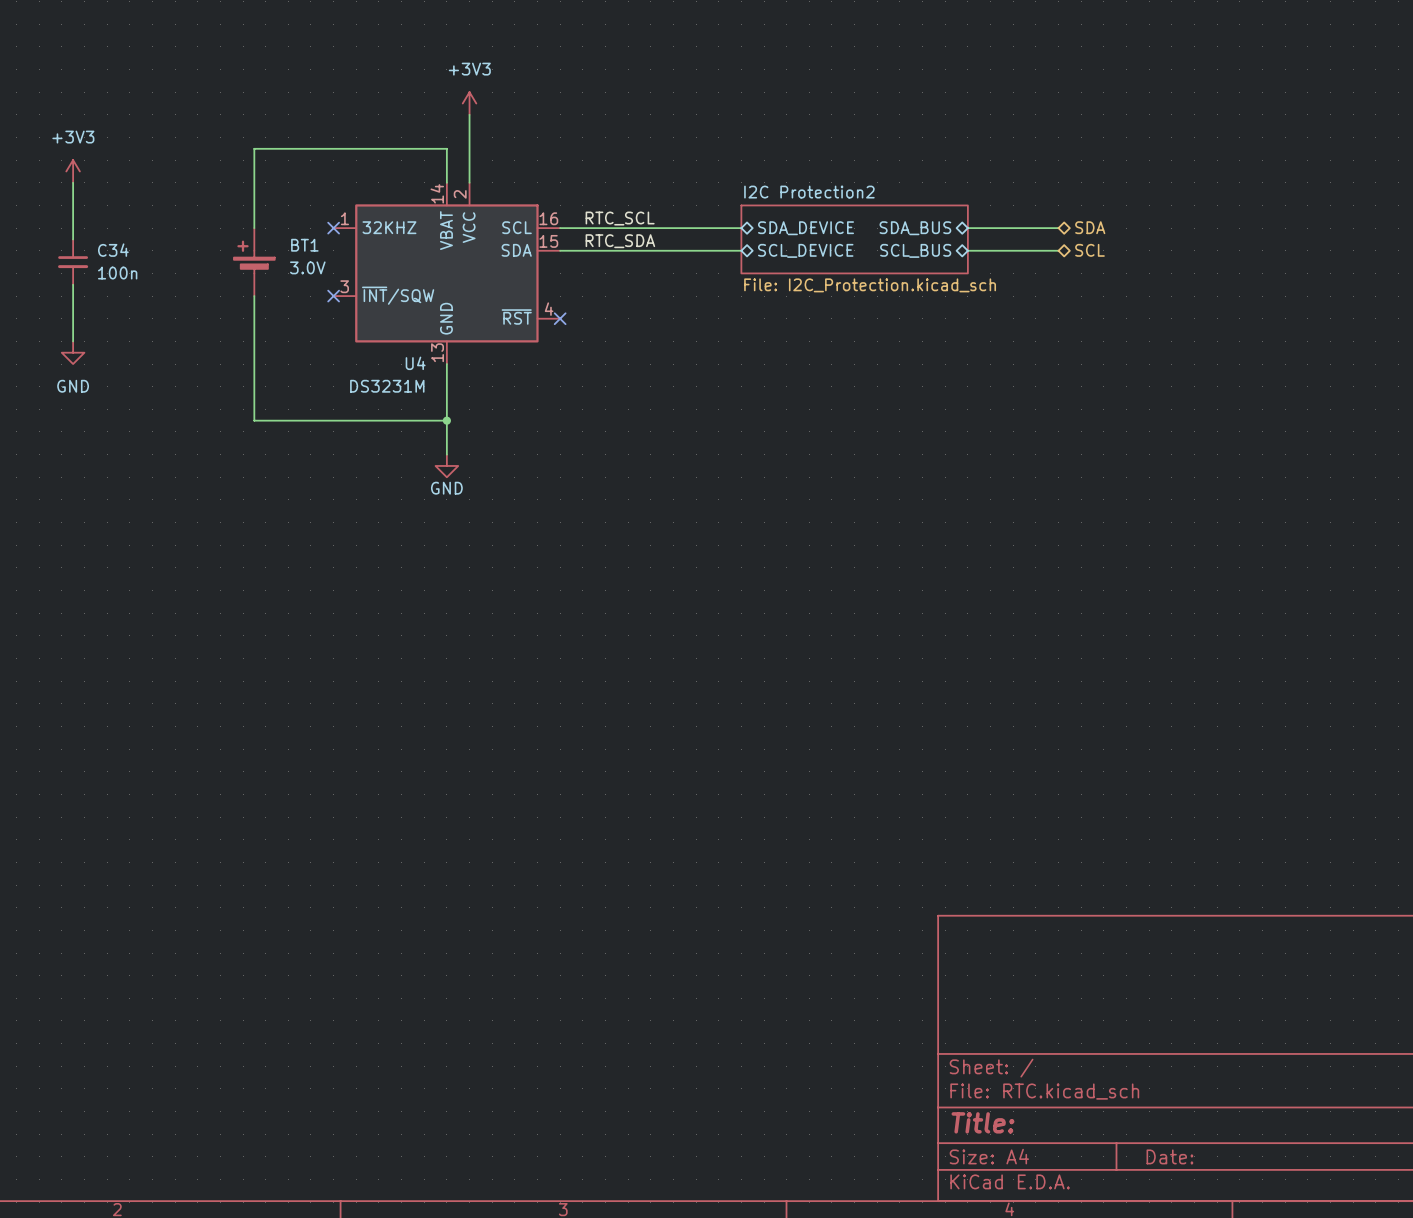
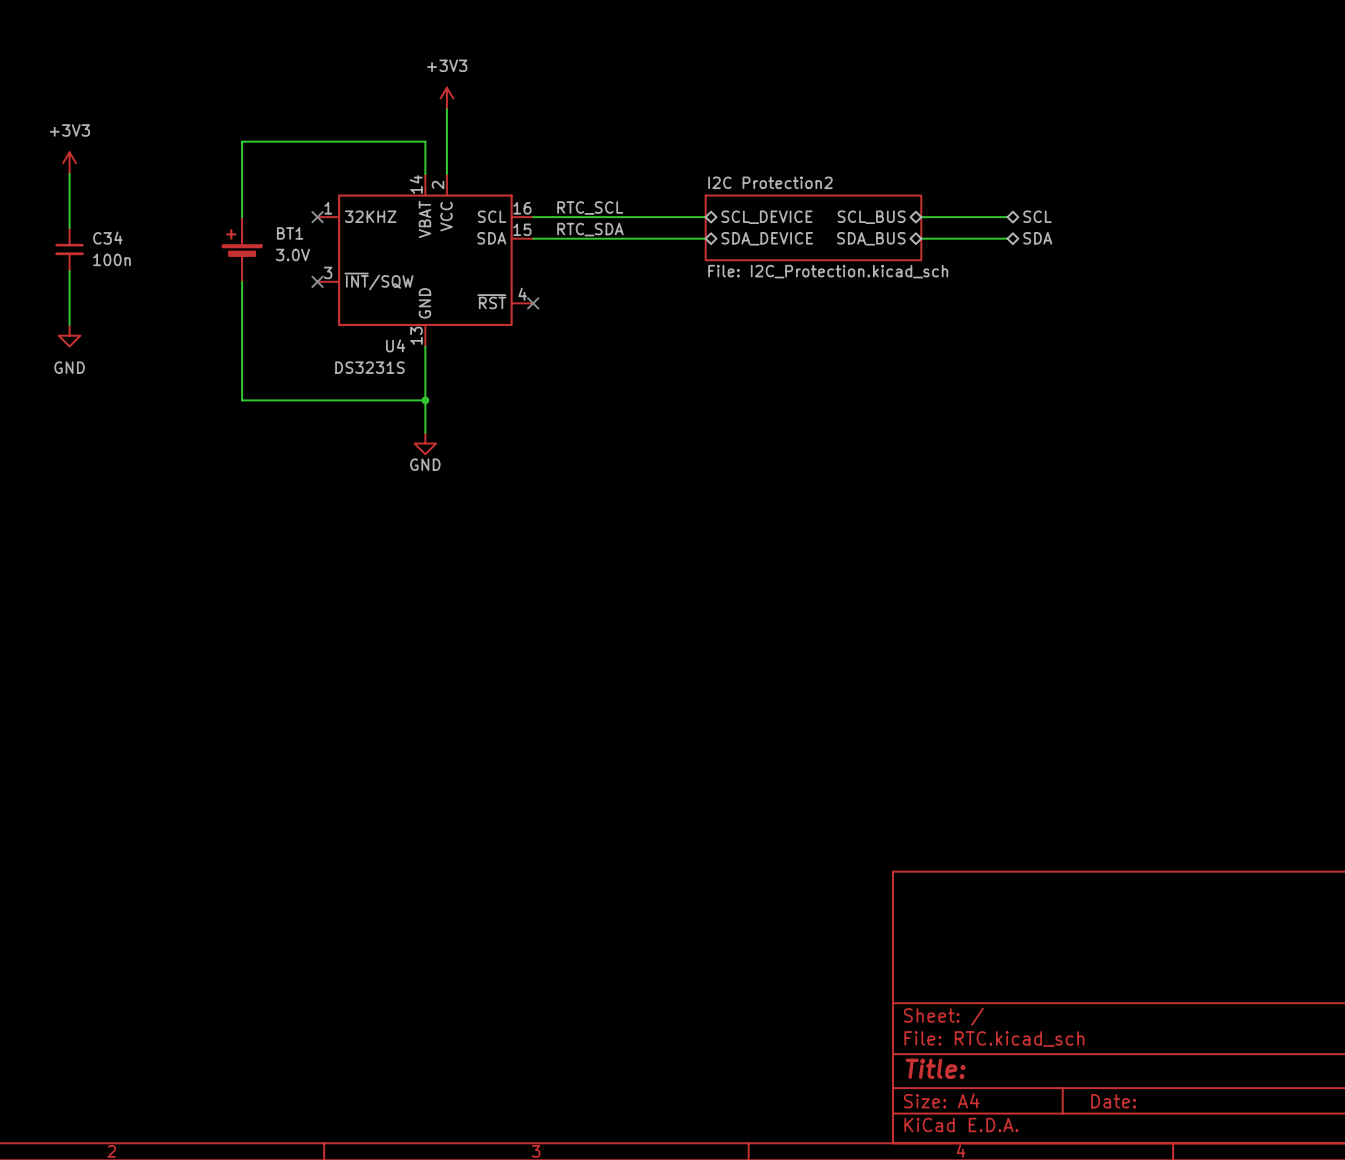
hierarchical label: SDA (1090, 227) -> SCL (1037, 216)
sheet pin: SDA_DEVICE (806, 228) -> SCL_DEVICE (766, 217)
sheet pin: SDA_BUS (915, 228) -> SCL_BUS (871, 217)
sheet pin: SCL_DEVICE (805, 250) -> SDA_DEVICE (767, 238)
sheet pin: SCL_BUS (915, 250) -> SDA_BUS (871, 238)
hierarchical label: SCL (1089, 250) -> SDA (1037, 238)
U4 value: DS3231M (387, 386) -> DS3231S (369, 367)

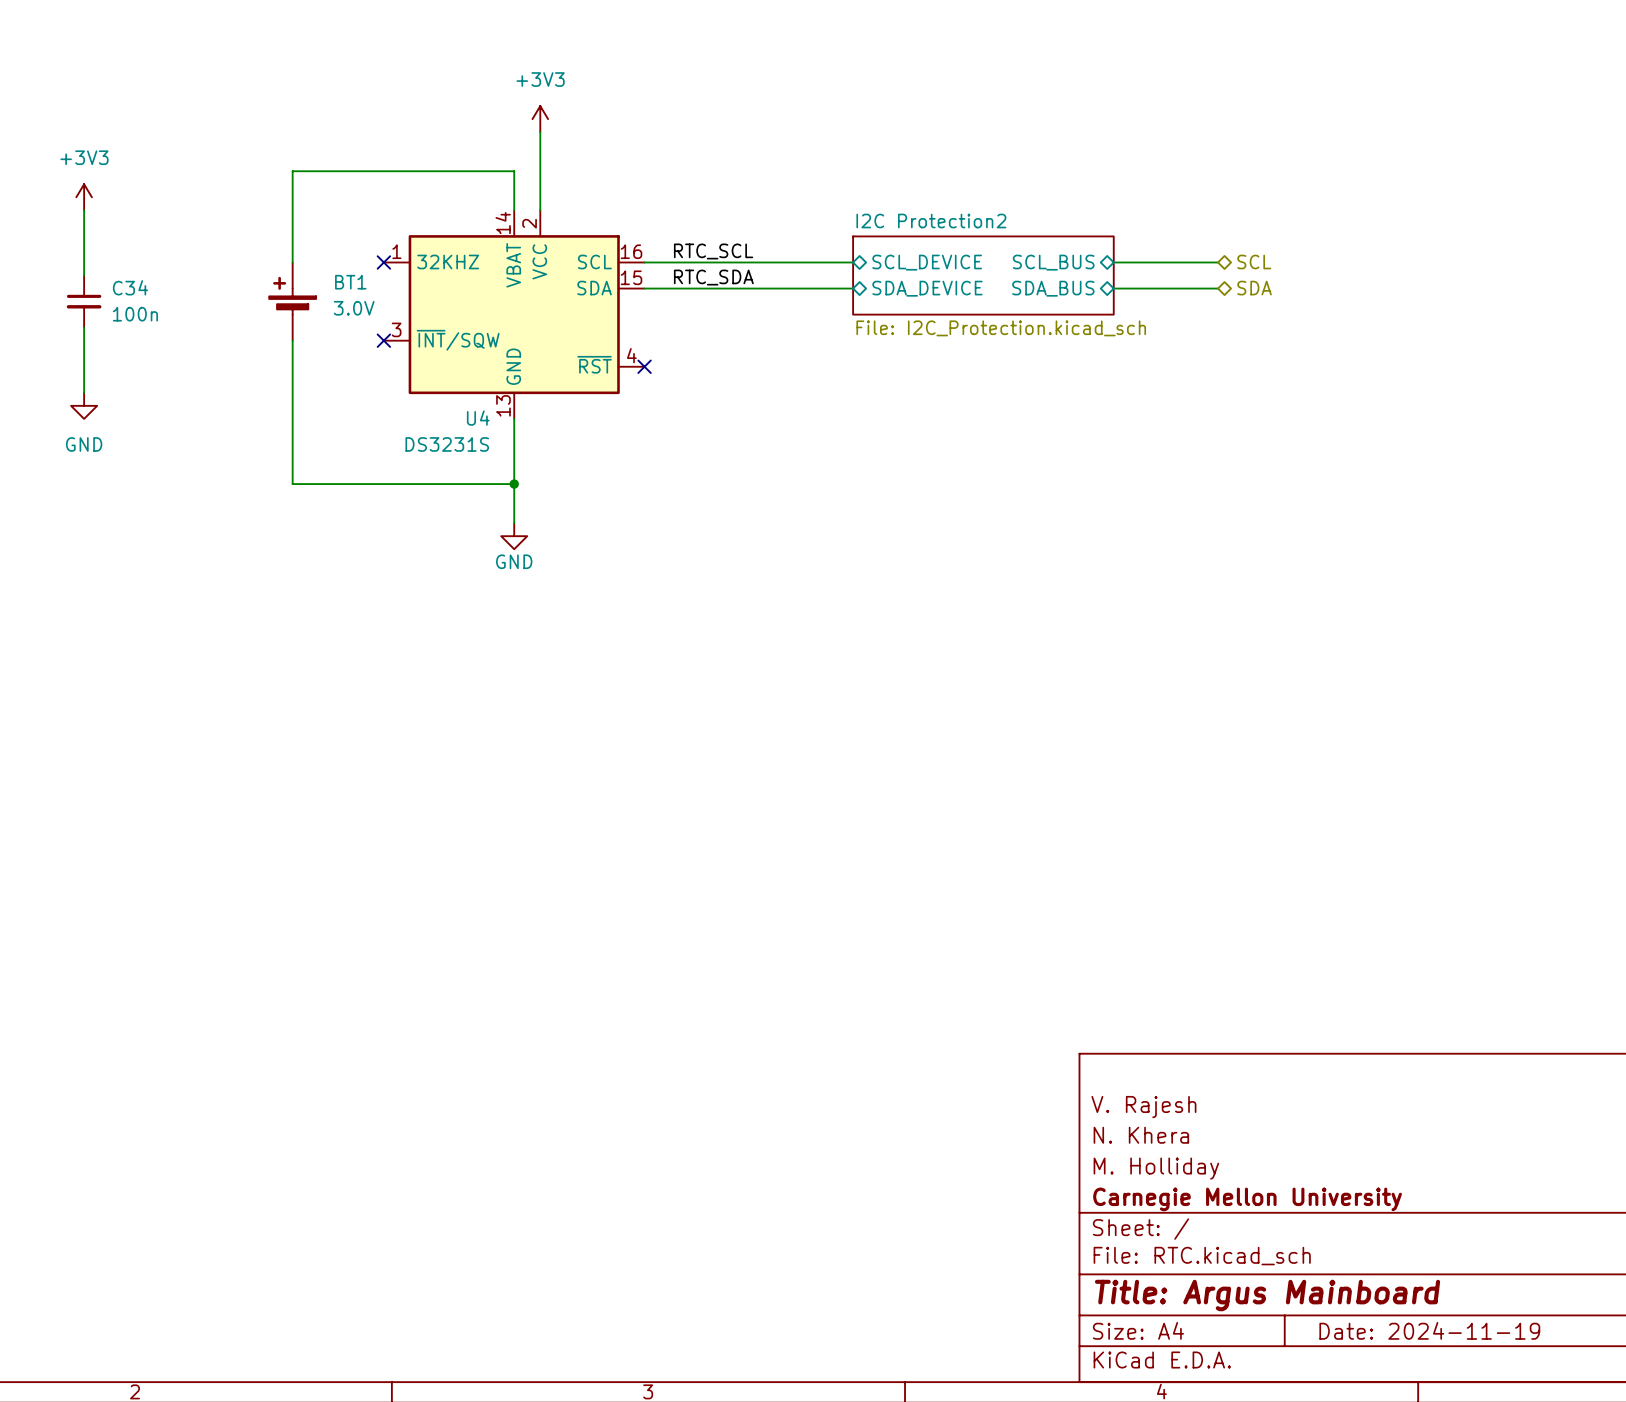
title block: none -> V. Rajesh (1143, 1107)
title block: none -> N. Khera (1141, 1135)
title block: none -> M. Holliday (1156, 1168)
title block: none -> Carnegie Mellon University (1247, 1199)
title block: Title: (935, 1068) -> Title: Argus Mainboard (1267, 1295)
title block: Date: (1113, 1101) -> Date: 2024-11-19 (1429, 1330)

